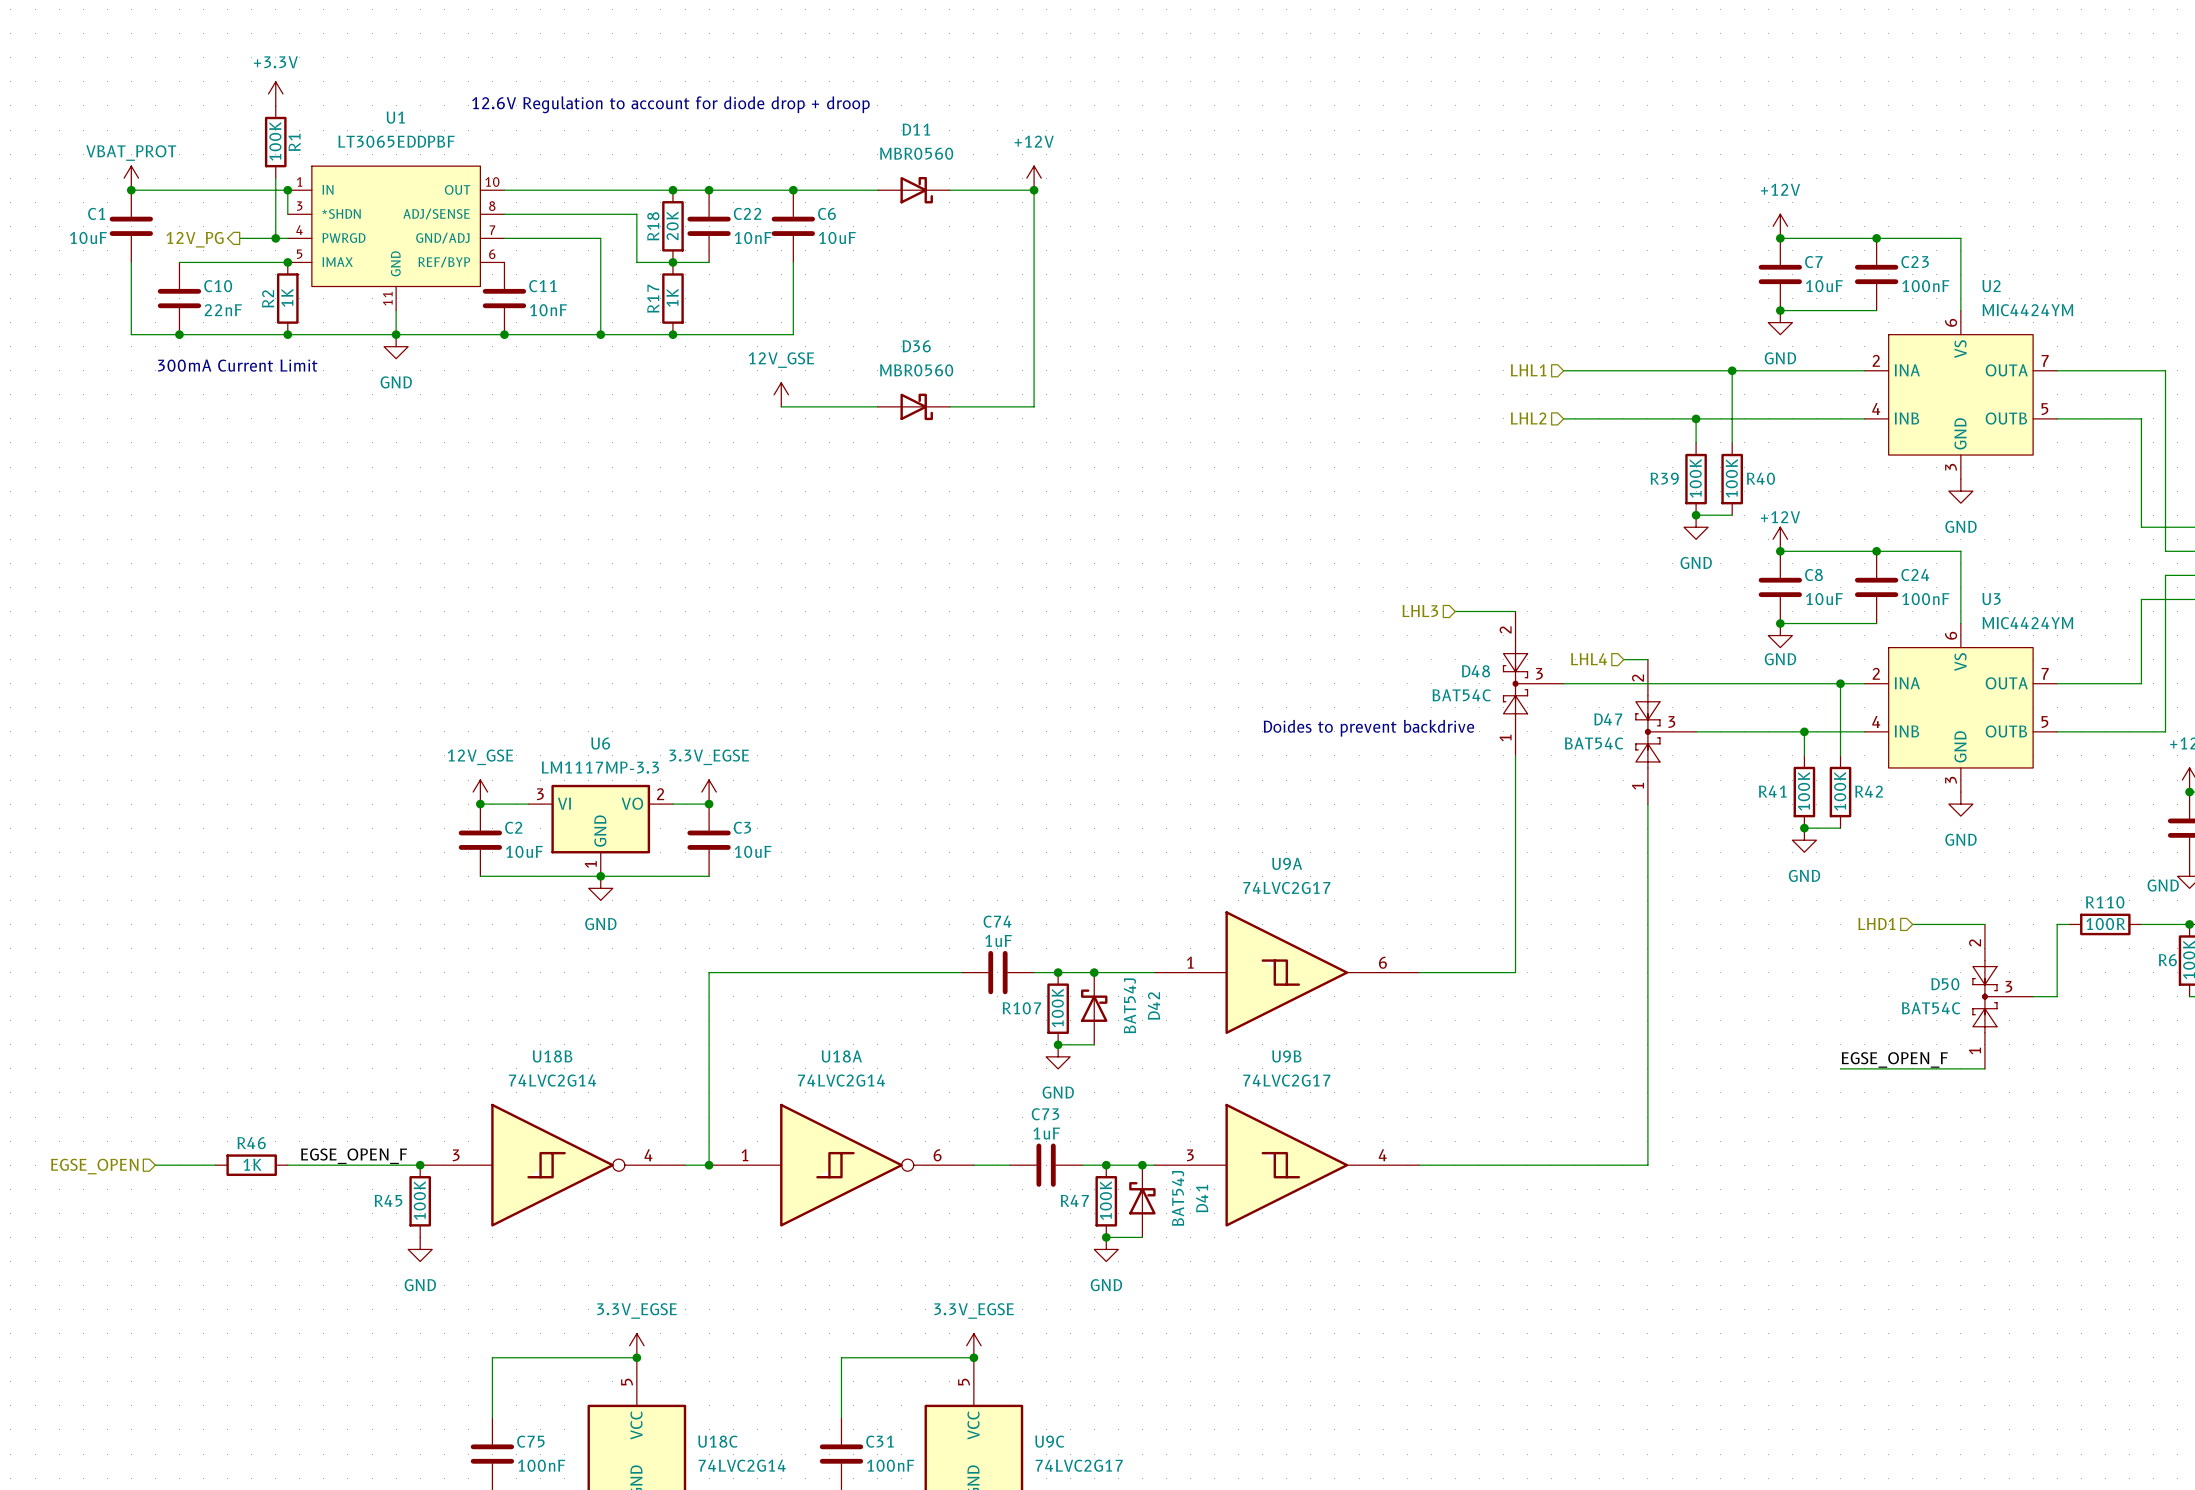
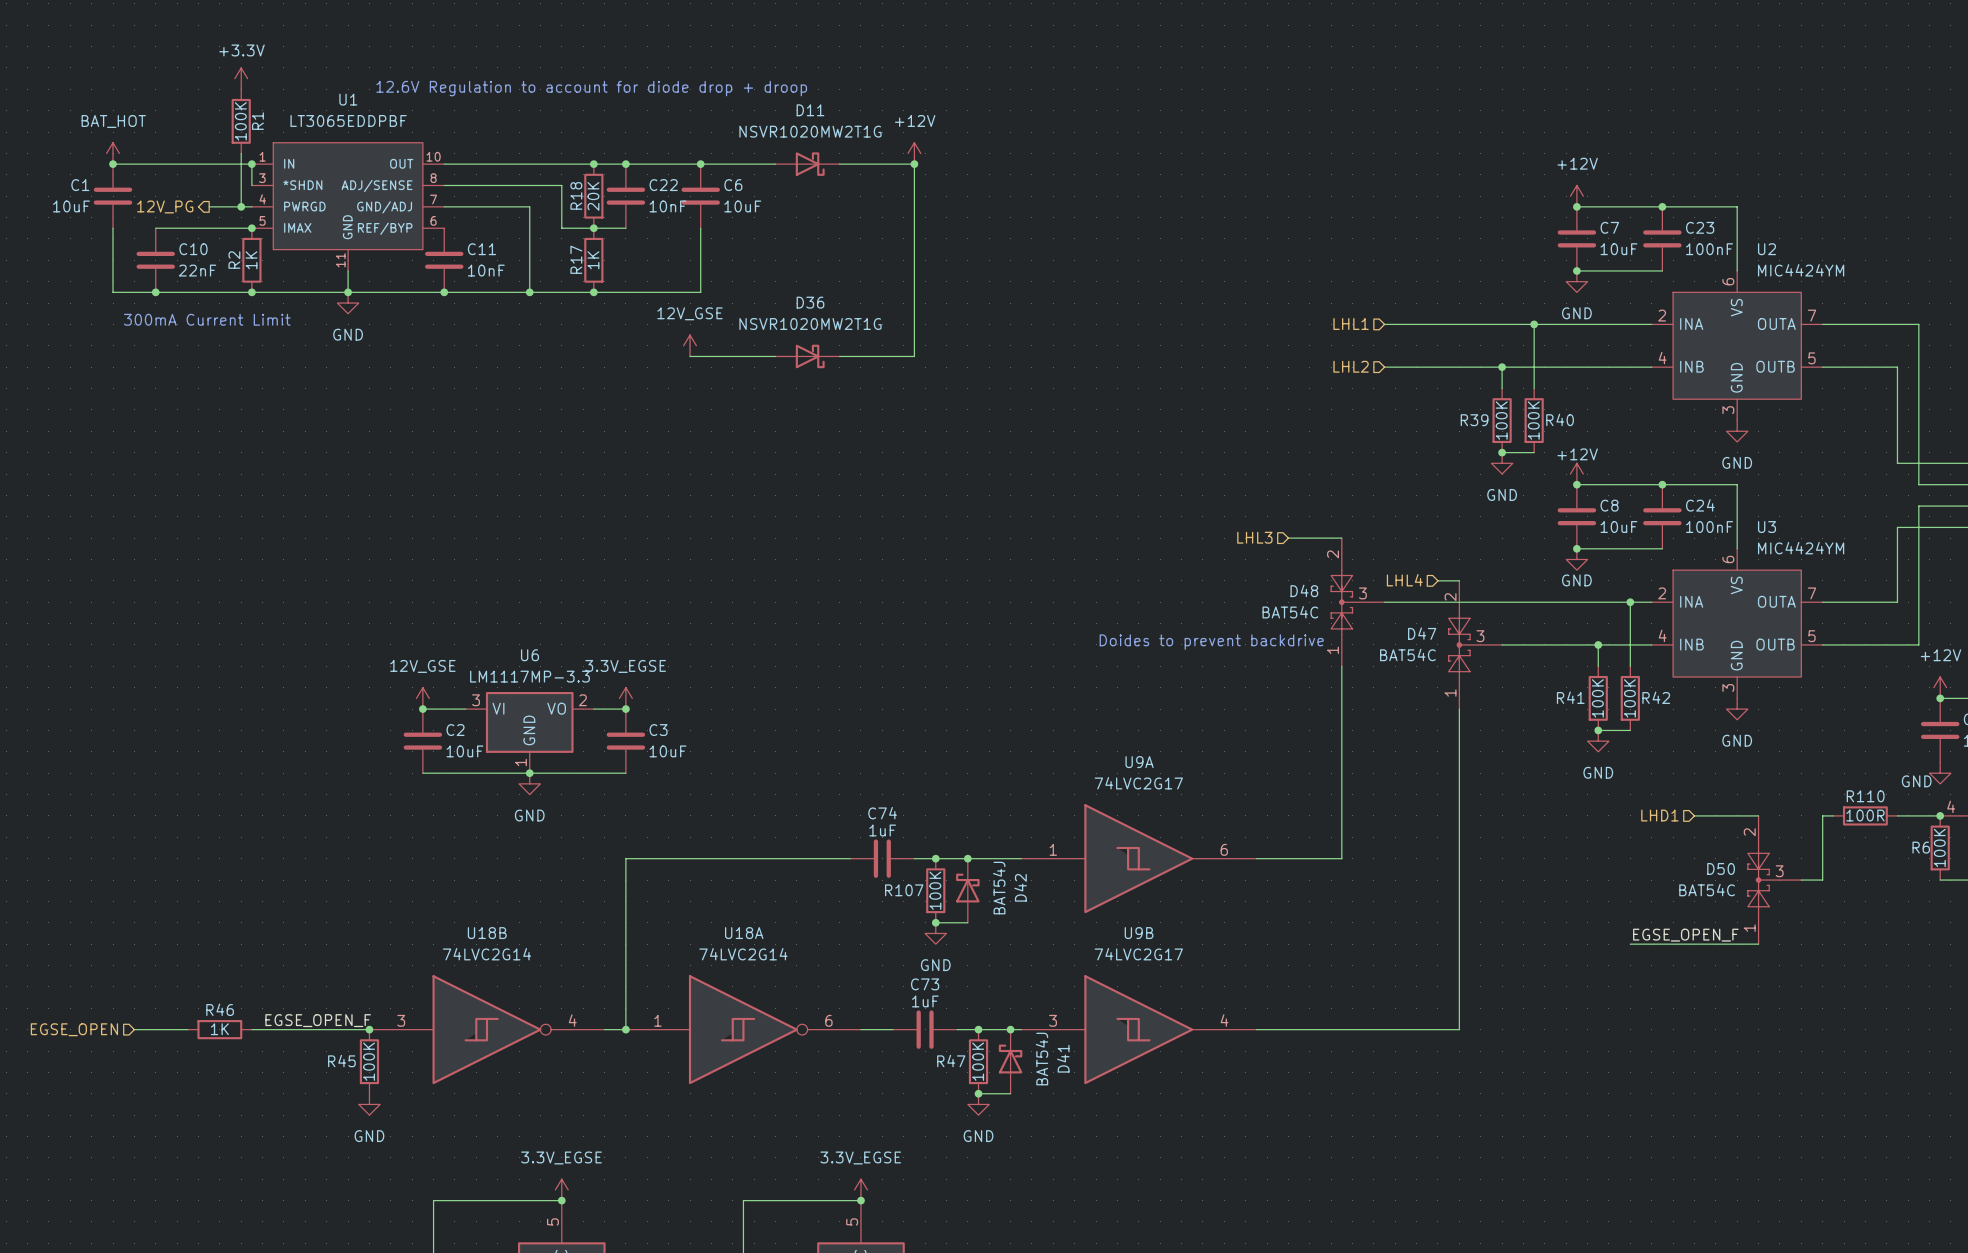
D11 value: MBR0560 (916, 153) -> NSVR1020MW2T1G (810, 131)
power symbol: VBAT_PROT (131, 178) -> BAT_HOT (113, 153)
D36 value: MBR0560 (916, 370) -> NSVR1020MW2T1G (810, 324)

